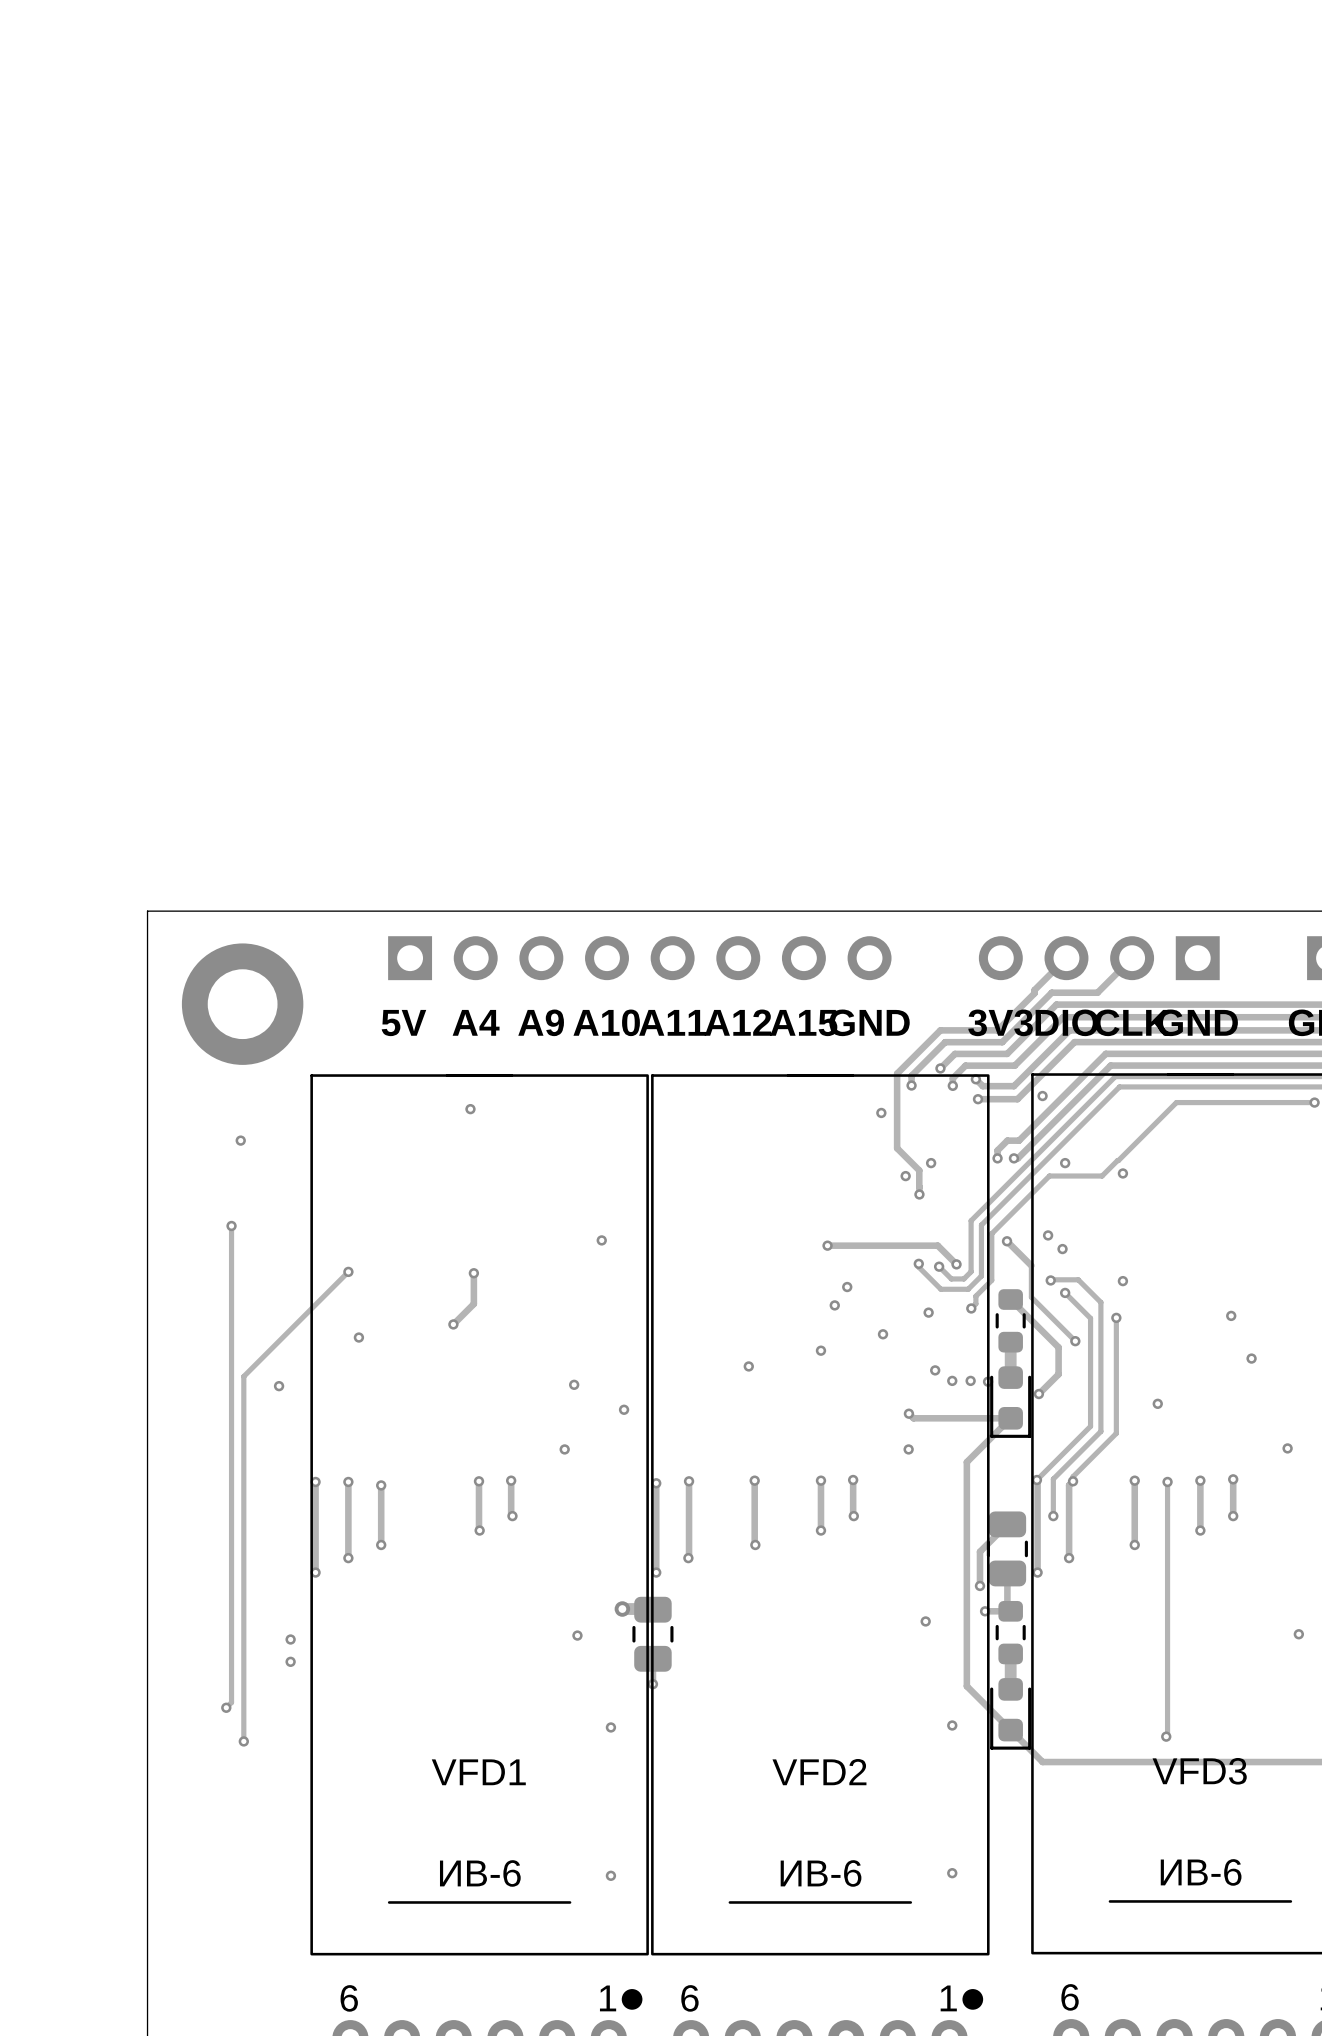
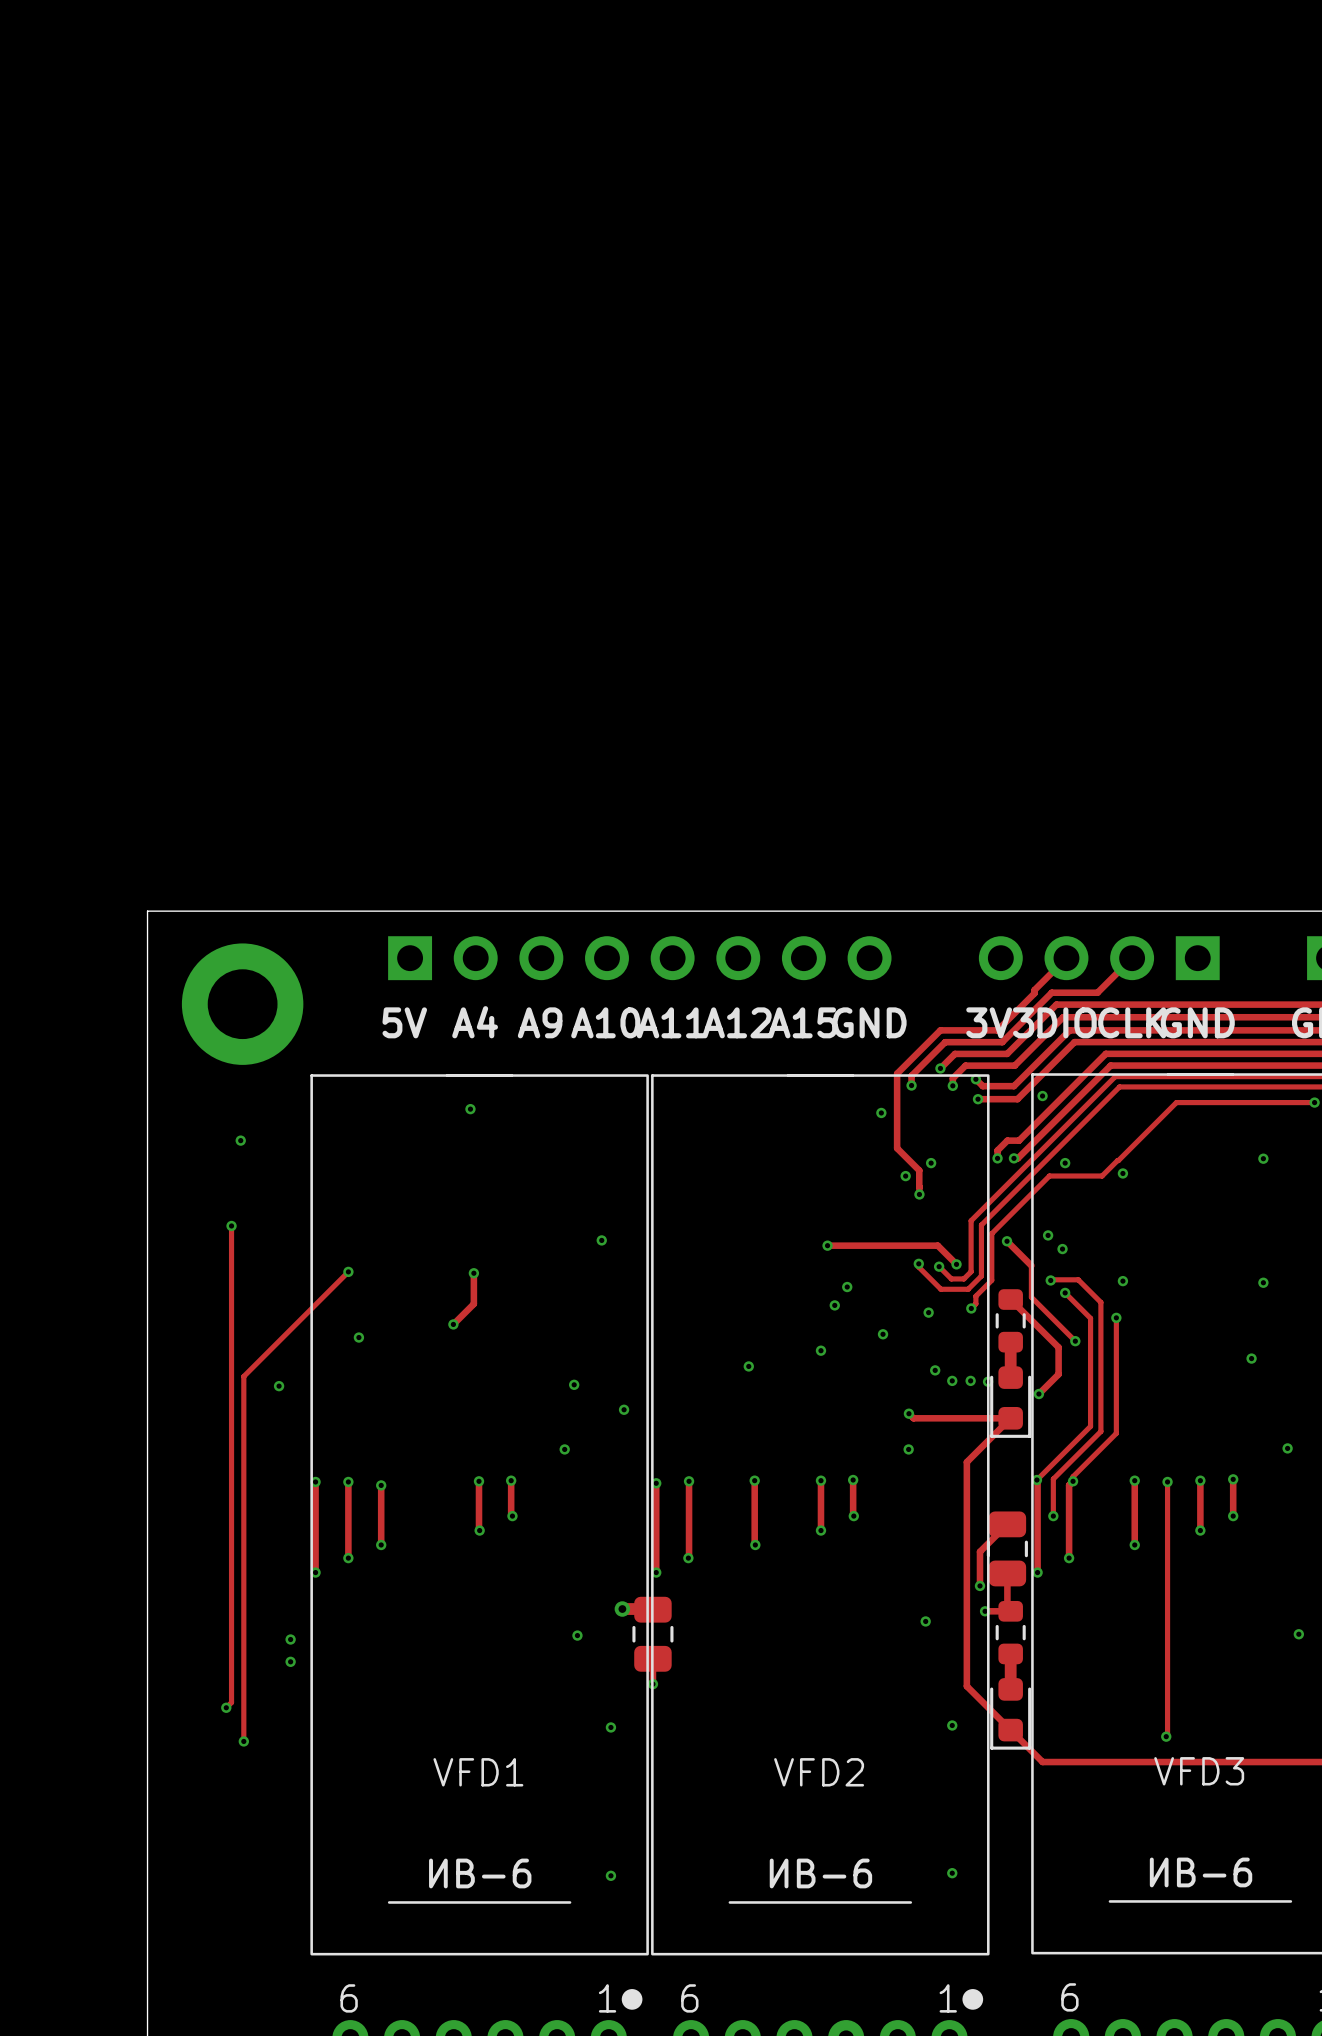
via: none -> (1263, 1158)
via position: (1231, 1315) -> (1263, 1282)
via: (1157, 1403) -> none

